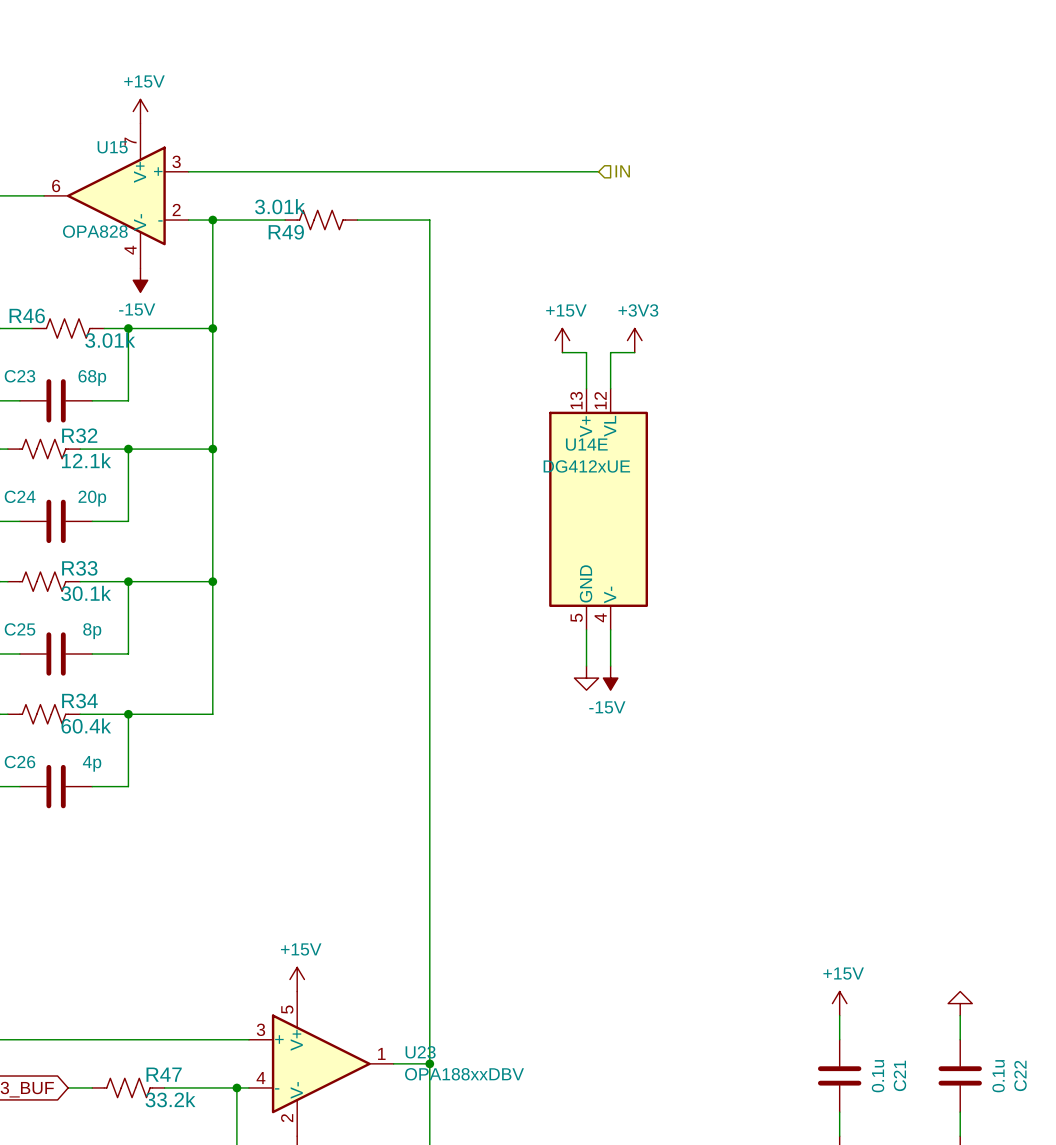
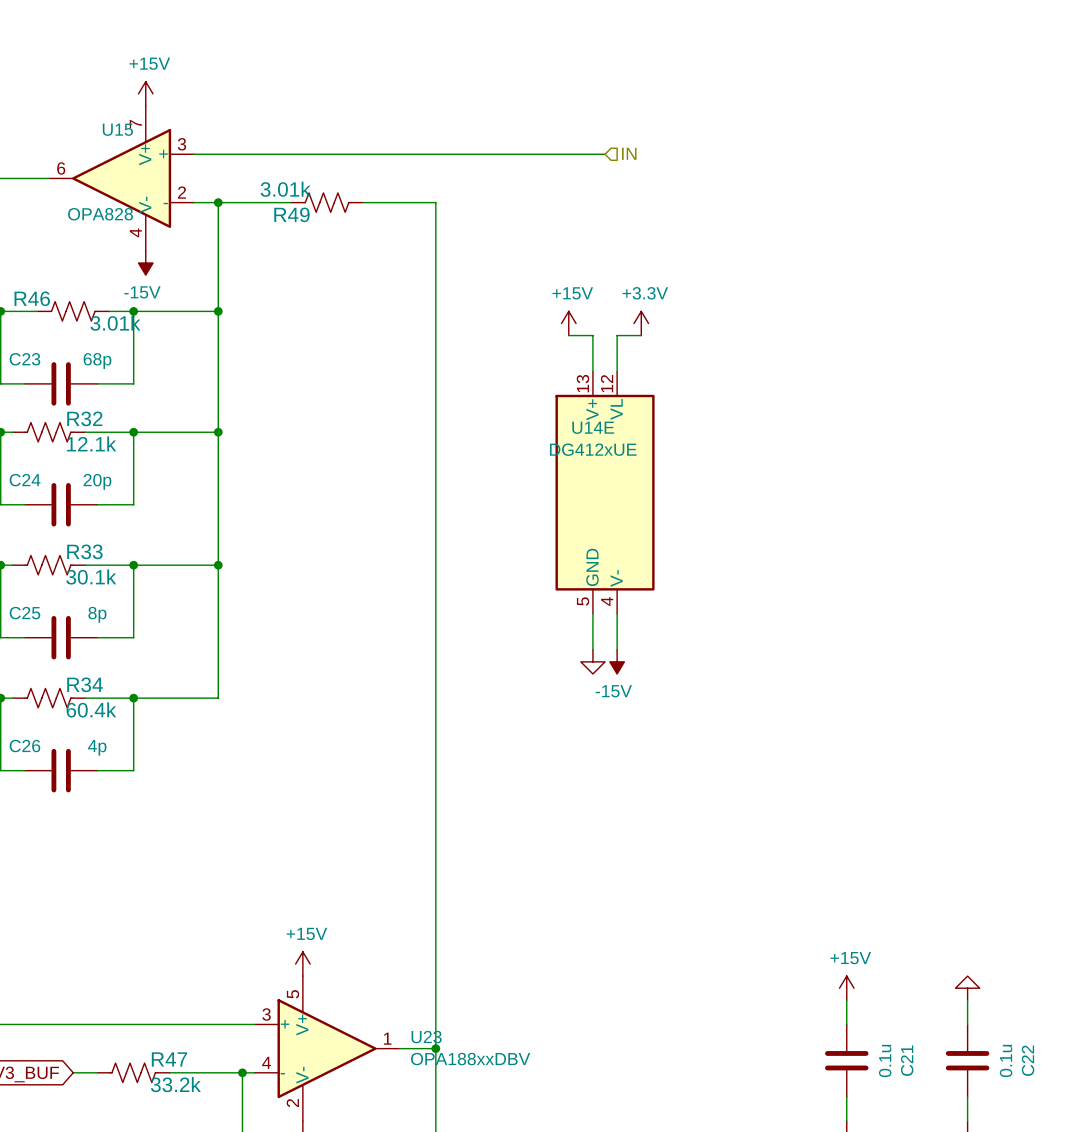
power symbol: +3V3 (634, 340) -> +3.3V (641, 323)

